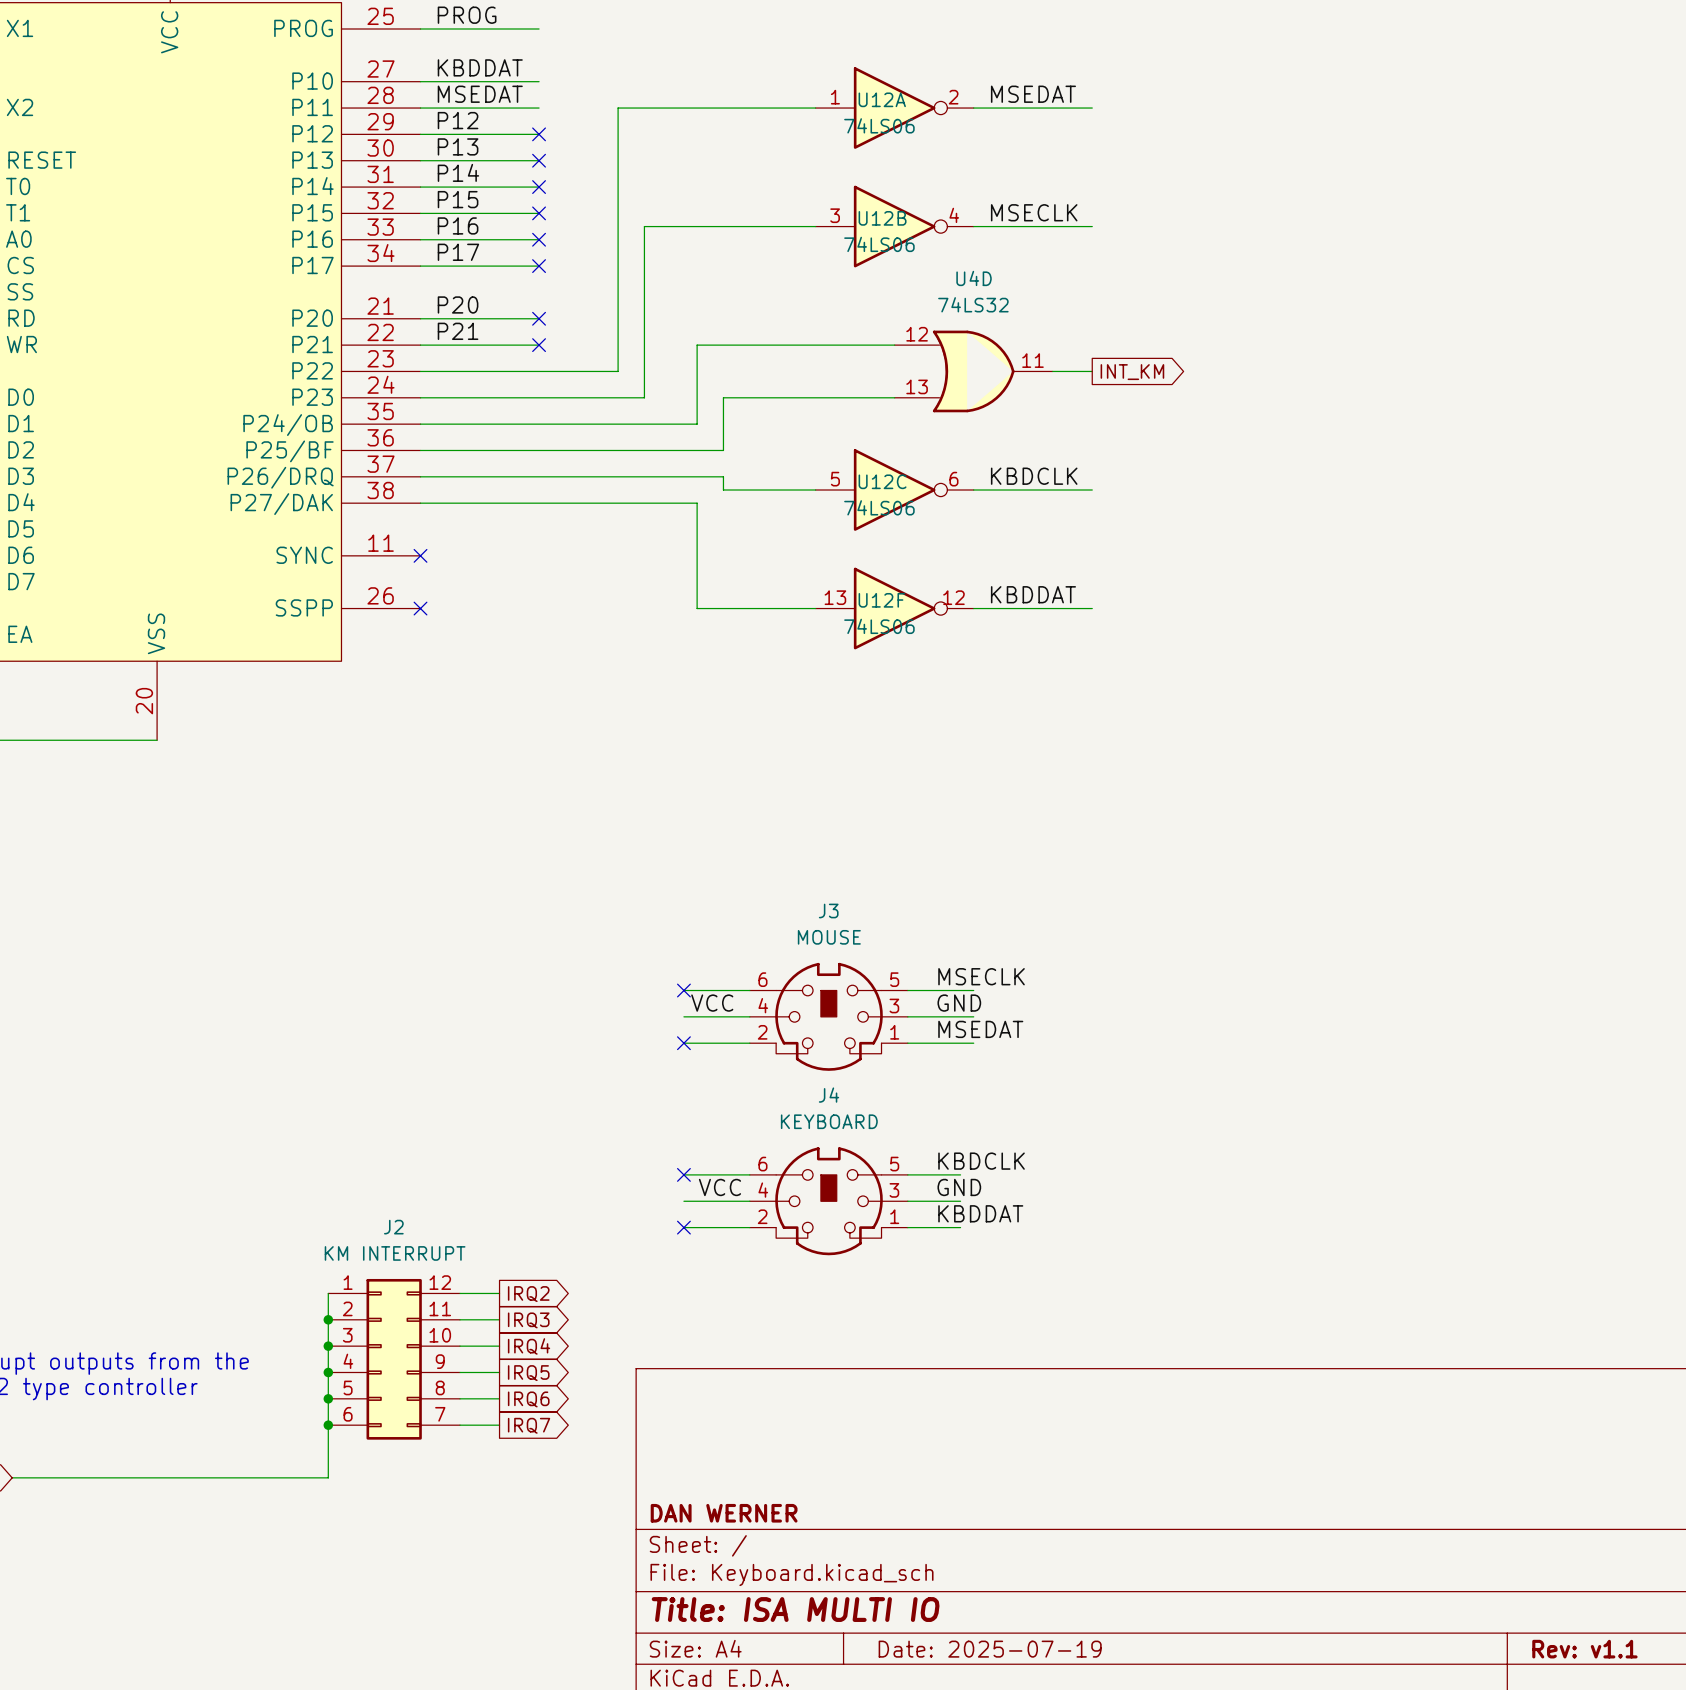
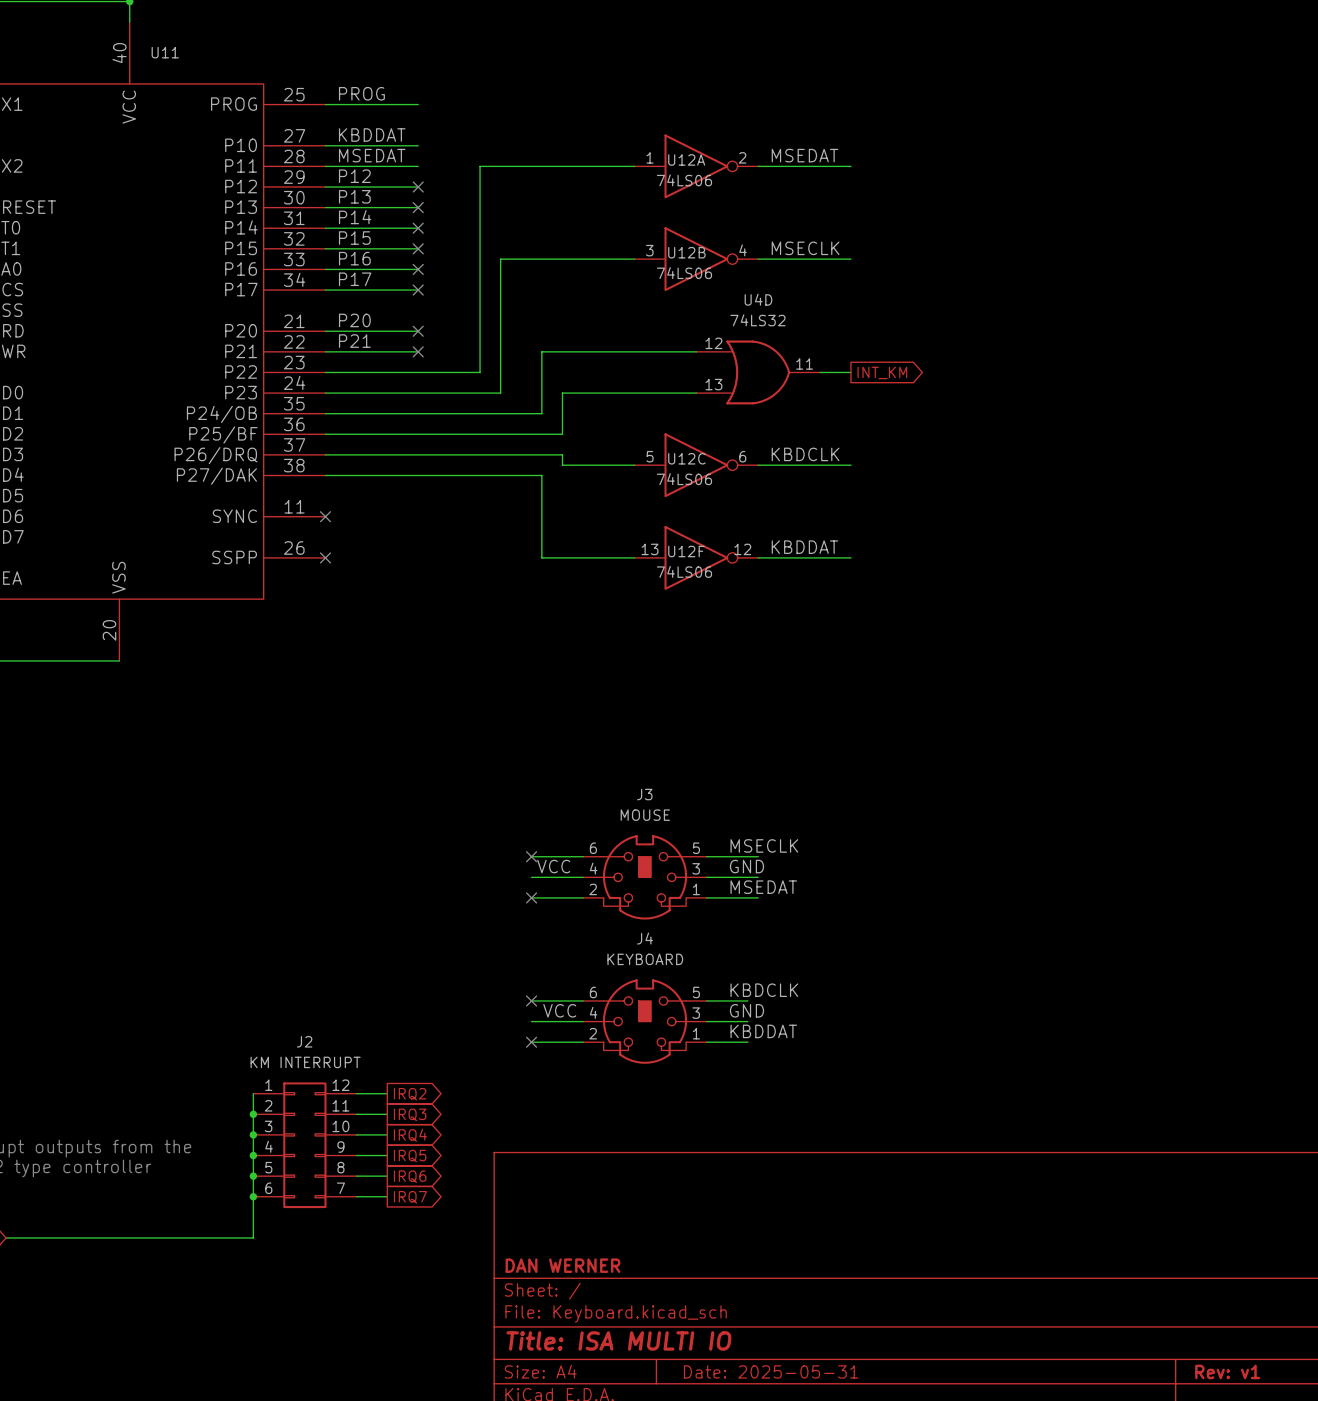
title block: Date: 2025-07-19 (990, 1649) -> Date: 2025-05-31 (771, 1371)
title block: Rev: v1.1 (1584, 1649) -> Rev: v1 (1227, 1371)

